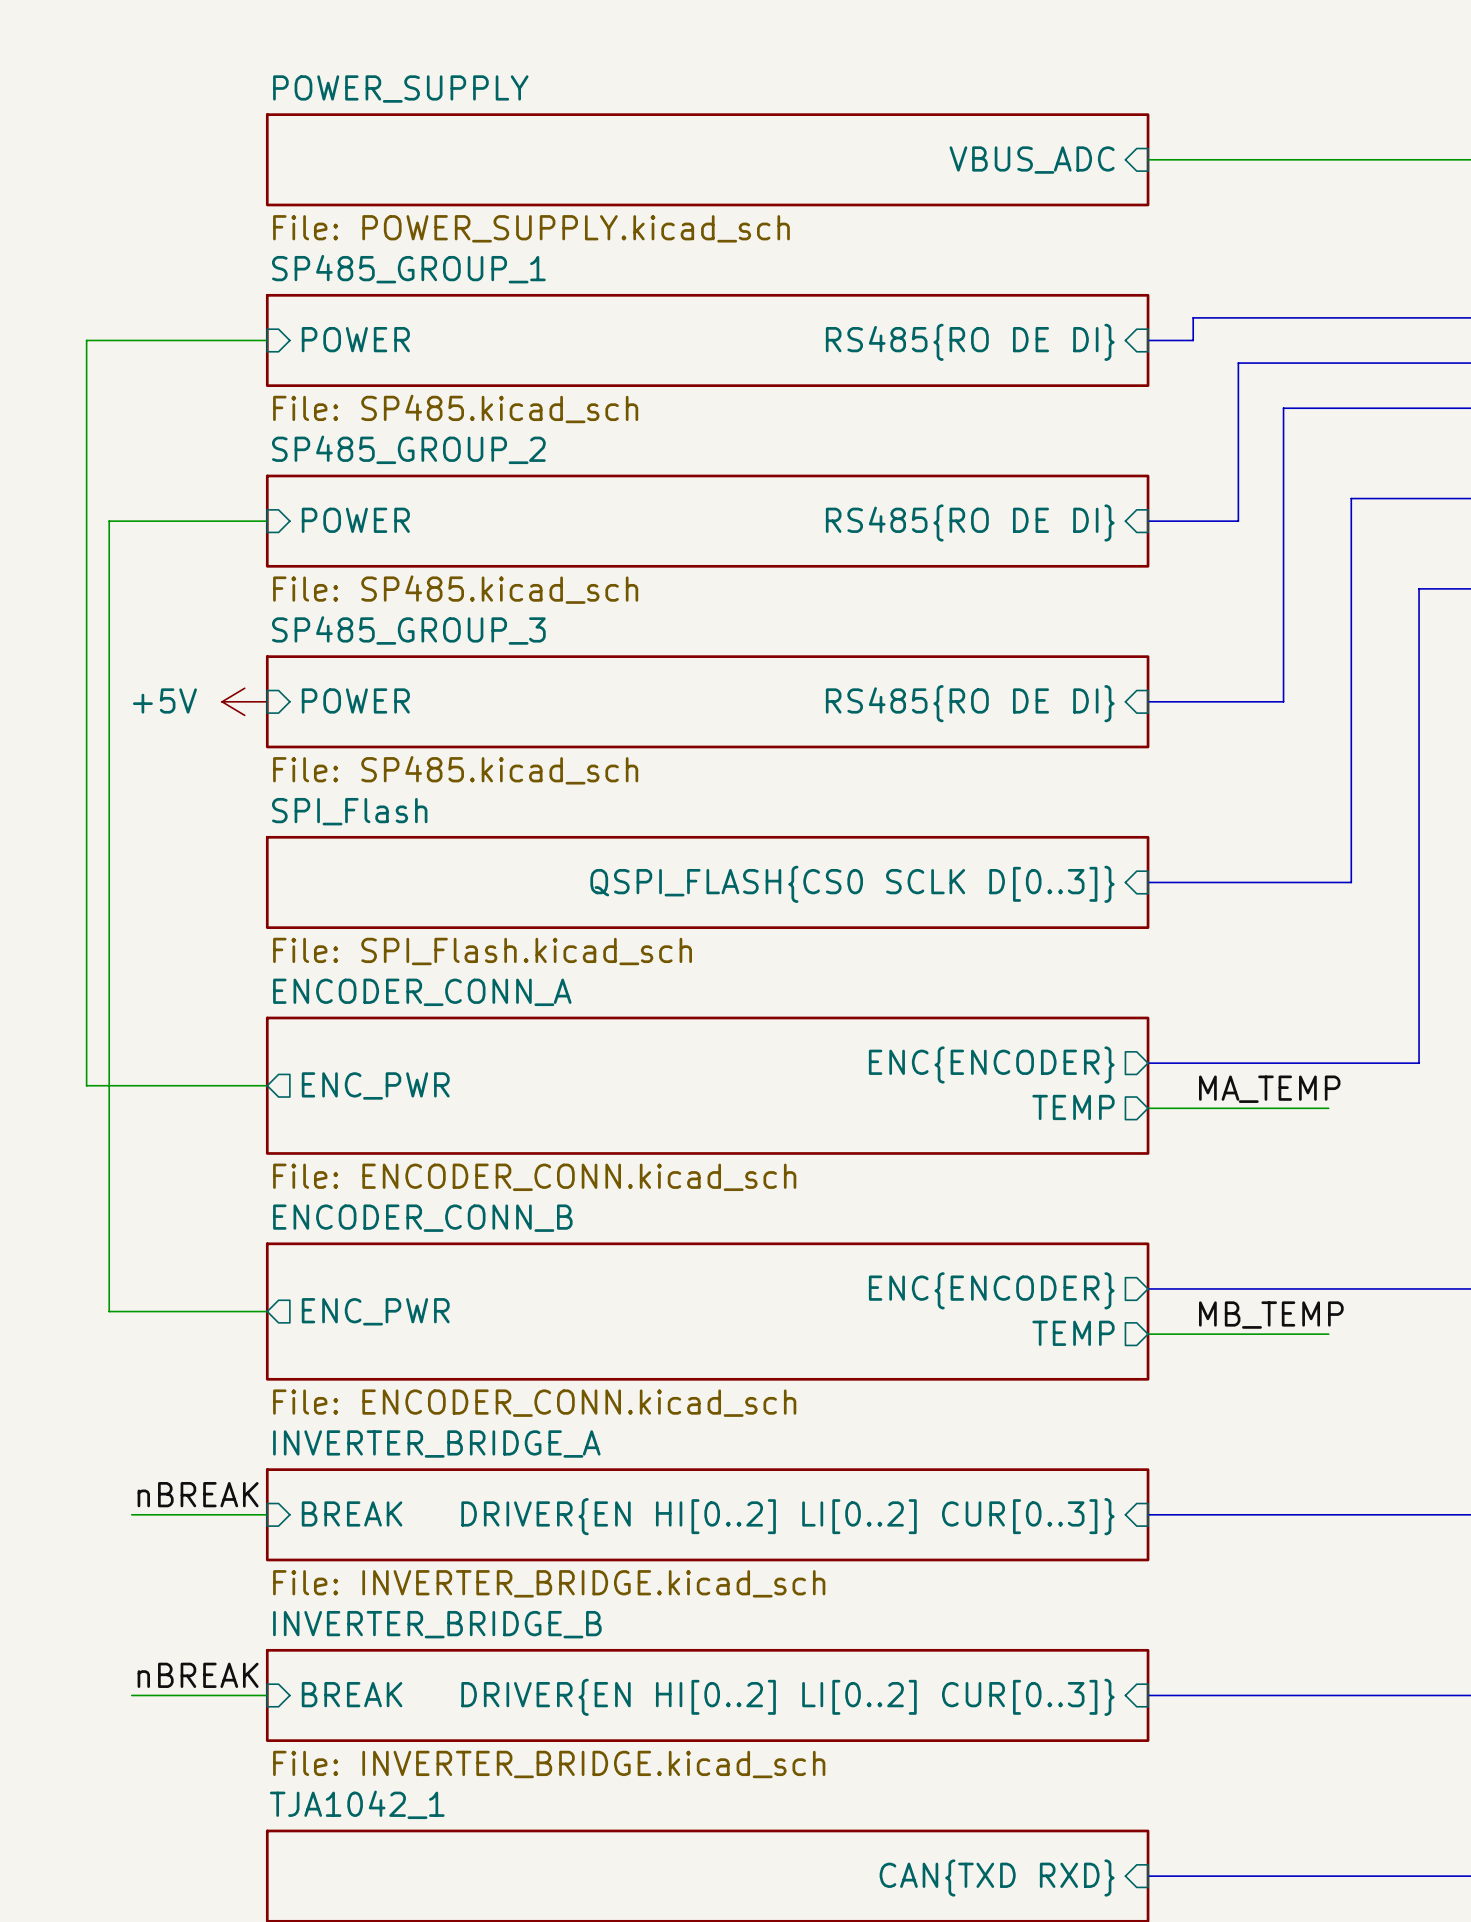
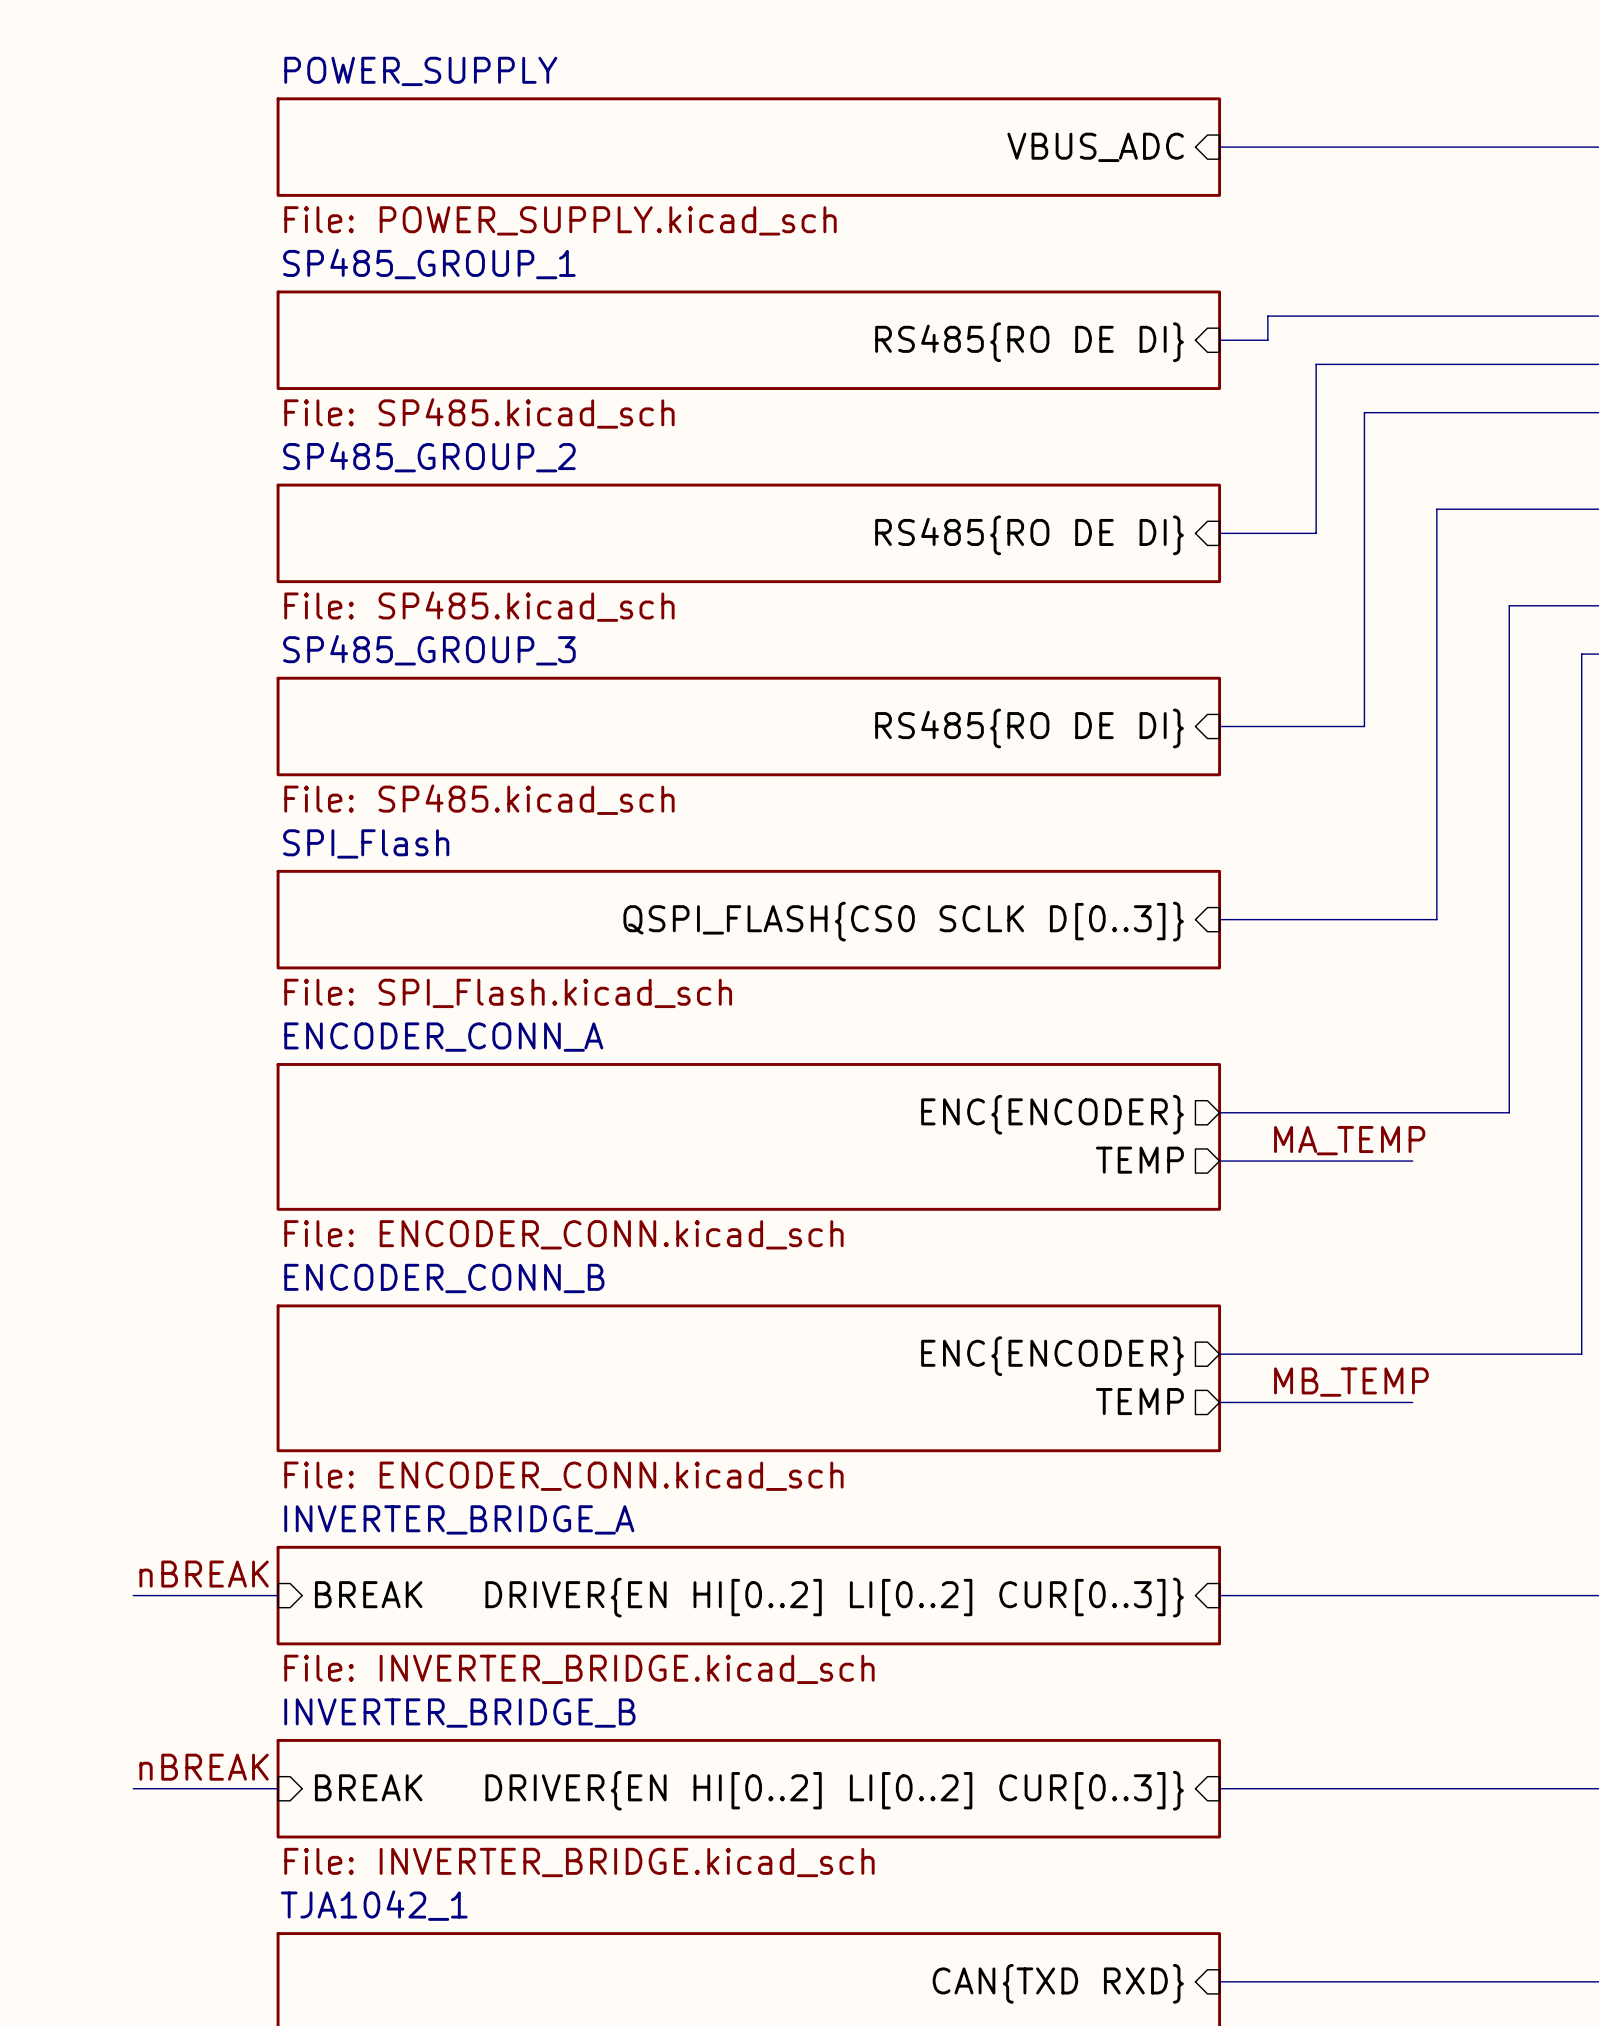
sheet pin: POWER (355, 339) -> none
wire: (267, 340) (86, 340) (86, 1085) (267, 1085) -> none
sheet pin: POWER (355, 520) -> none
wire: (267, 521) (109, 521) (109, 1311) (267, 1311) -> none
sheet pin: POWER (355, 700) -> none
power symbol: +5V (244, 701) -> none
sheet pin: ENC_PWR (375, 1085) -> none
sheet pin: ENC_PWR (375, 1311) -> none

